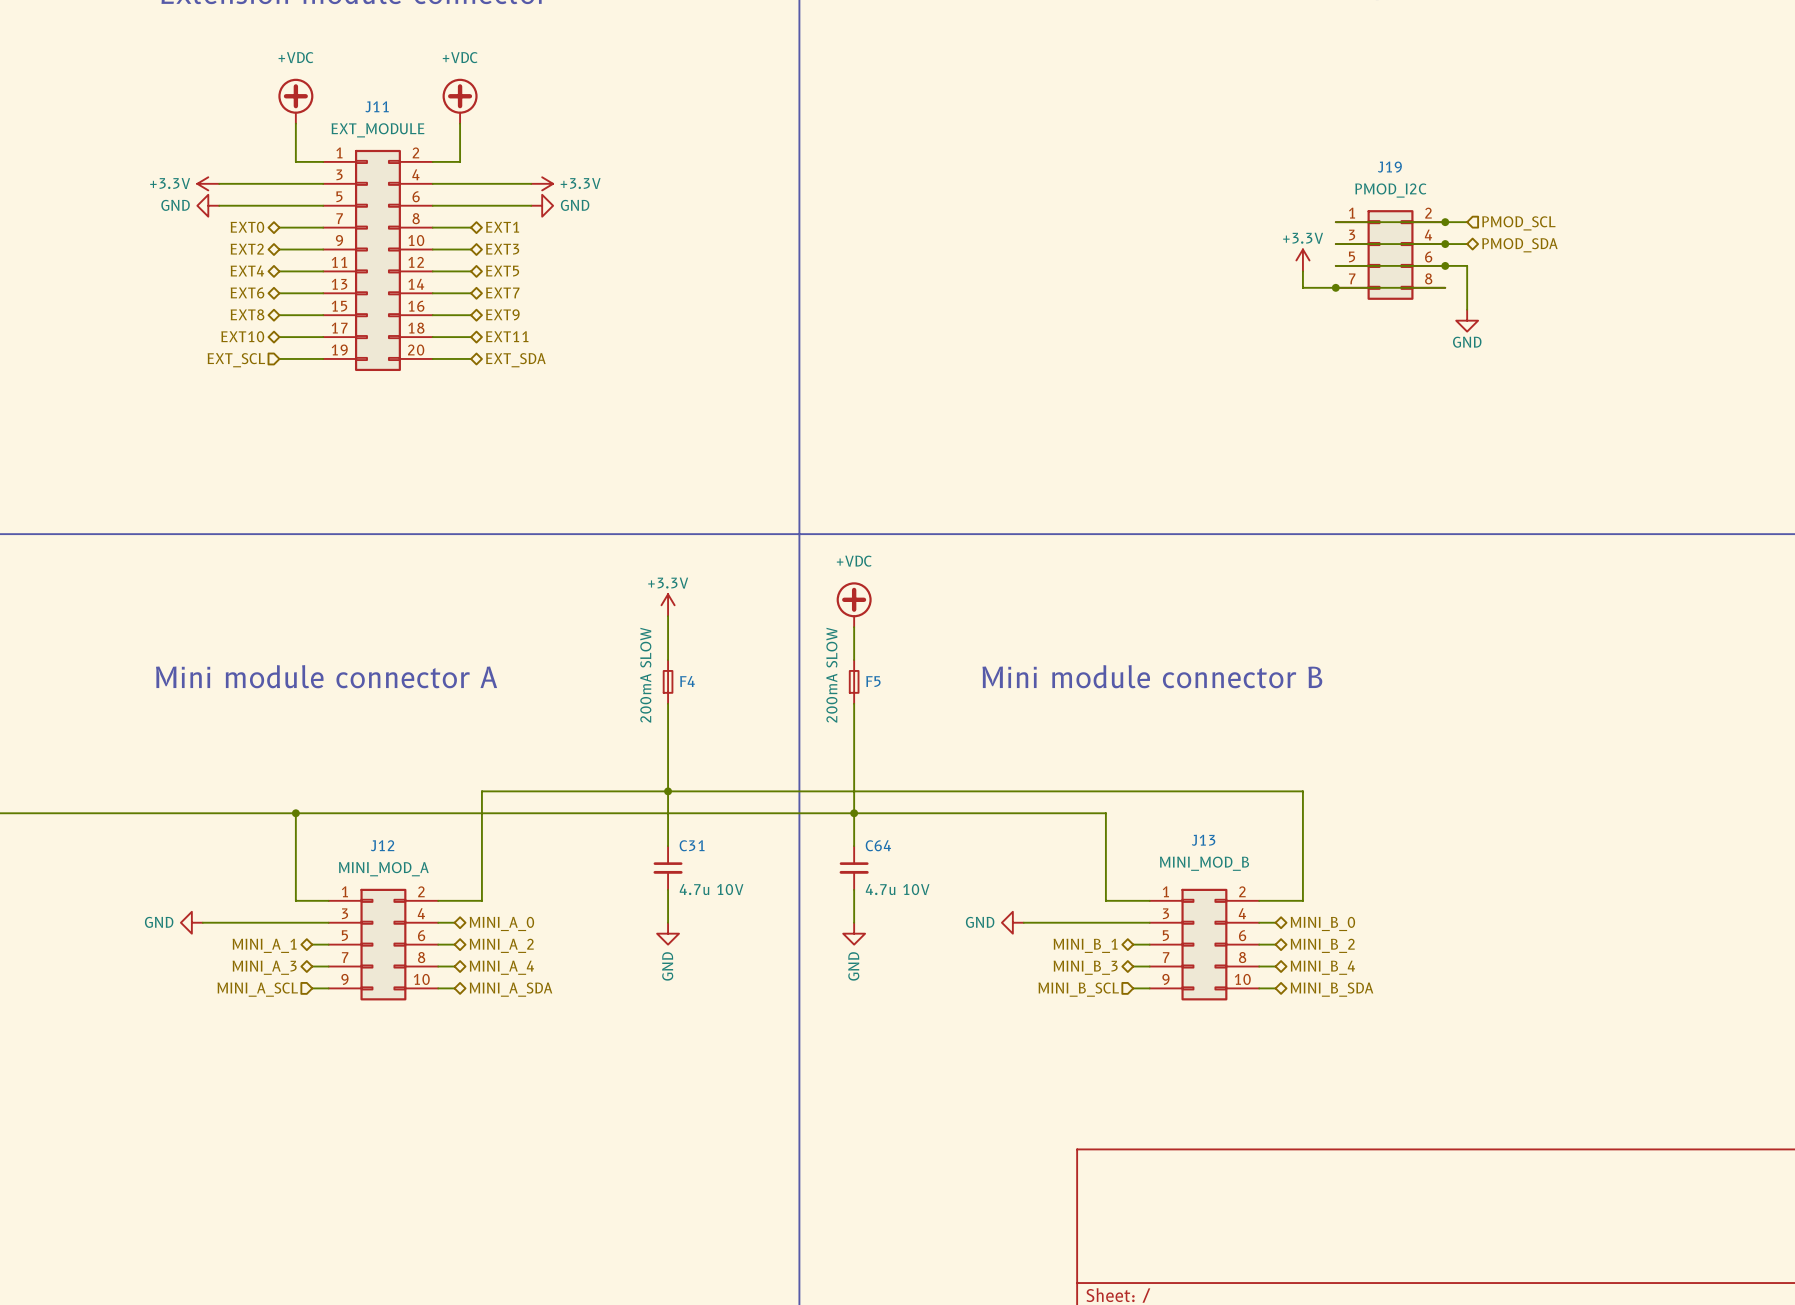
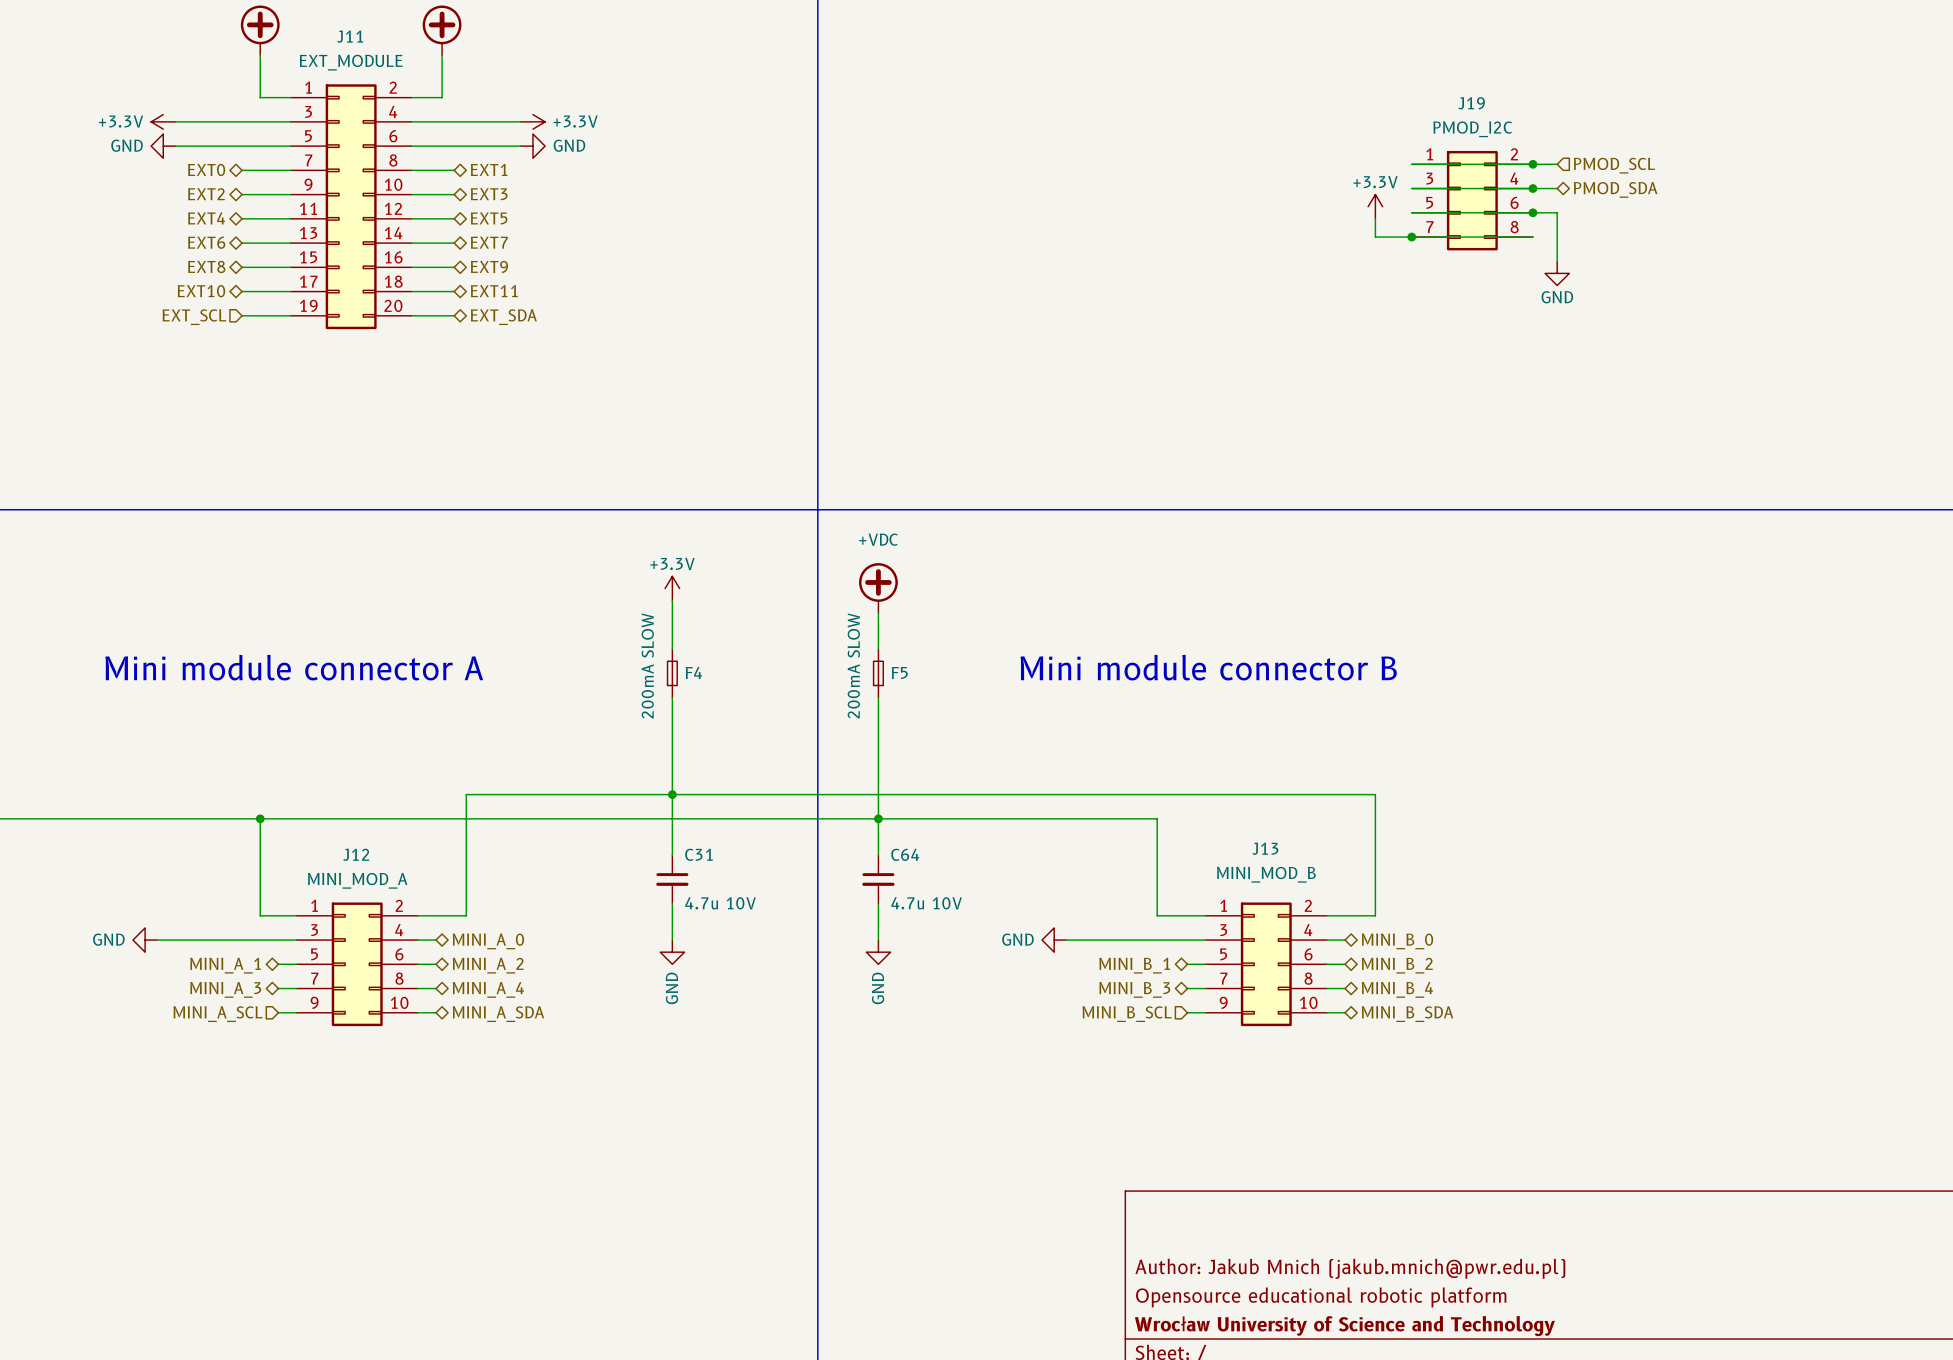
title block: none -> Author: Jakub Mnich (jakub.mnich@pwr.edu.pl) (1350, 1268)
title block: none -> Opensource educational robotic platform (1321, 1297)
title block: none -> Wrocław University of Science and Technology (1344, 1326)

